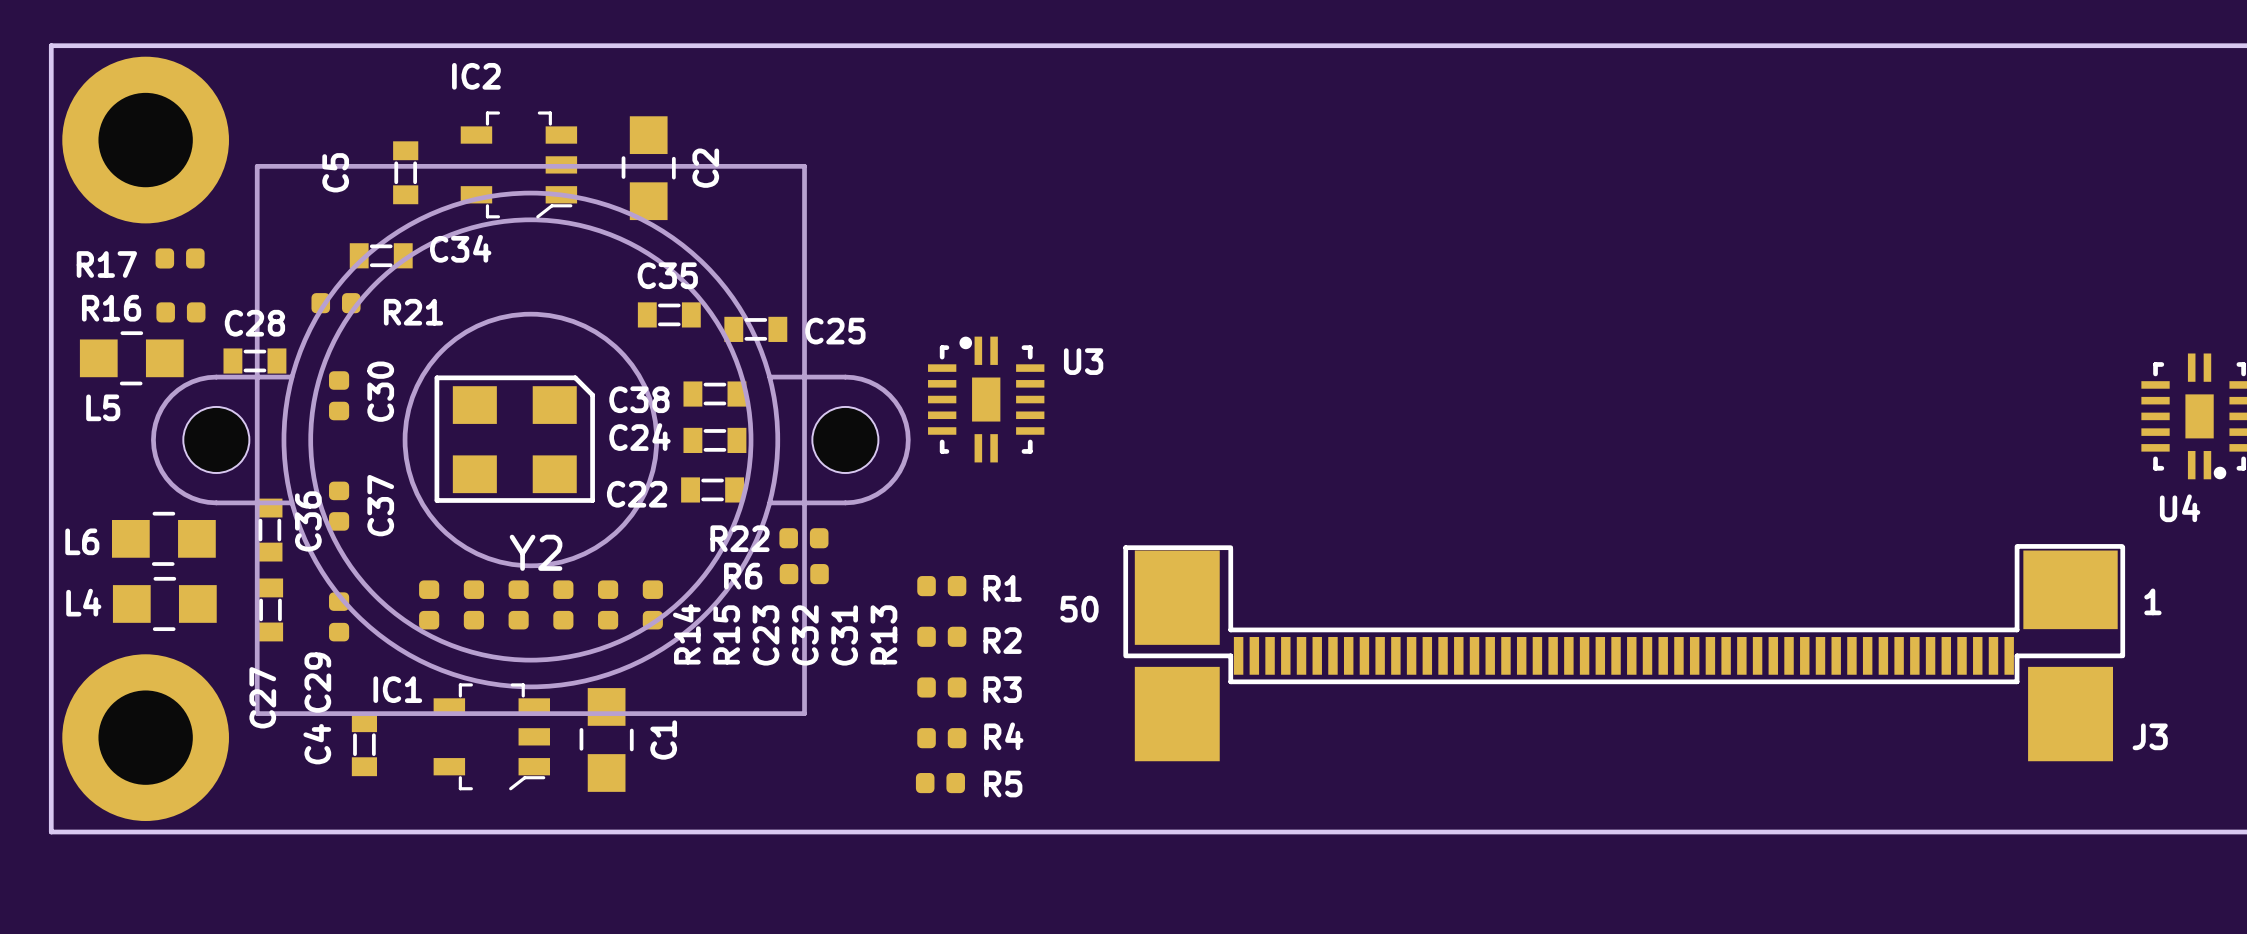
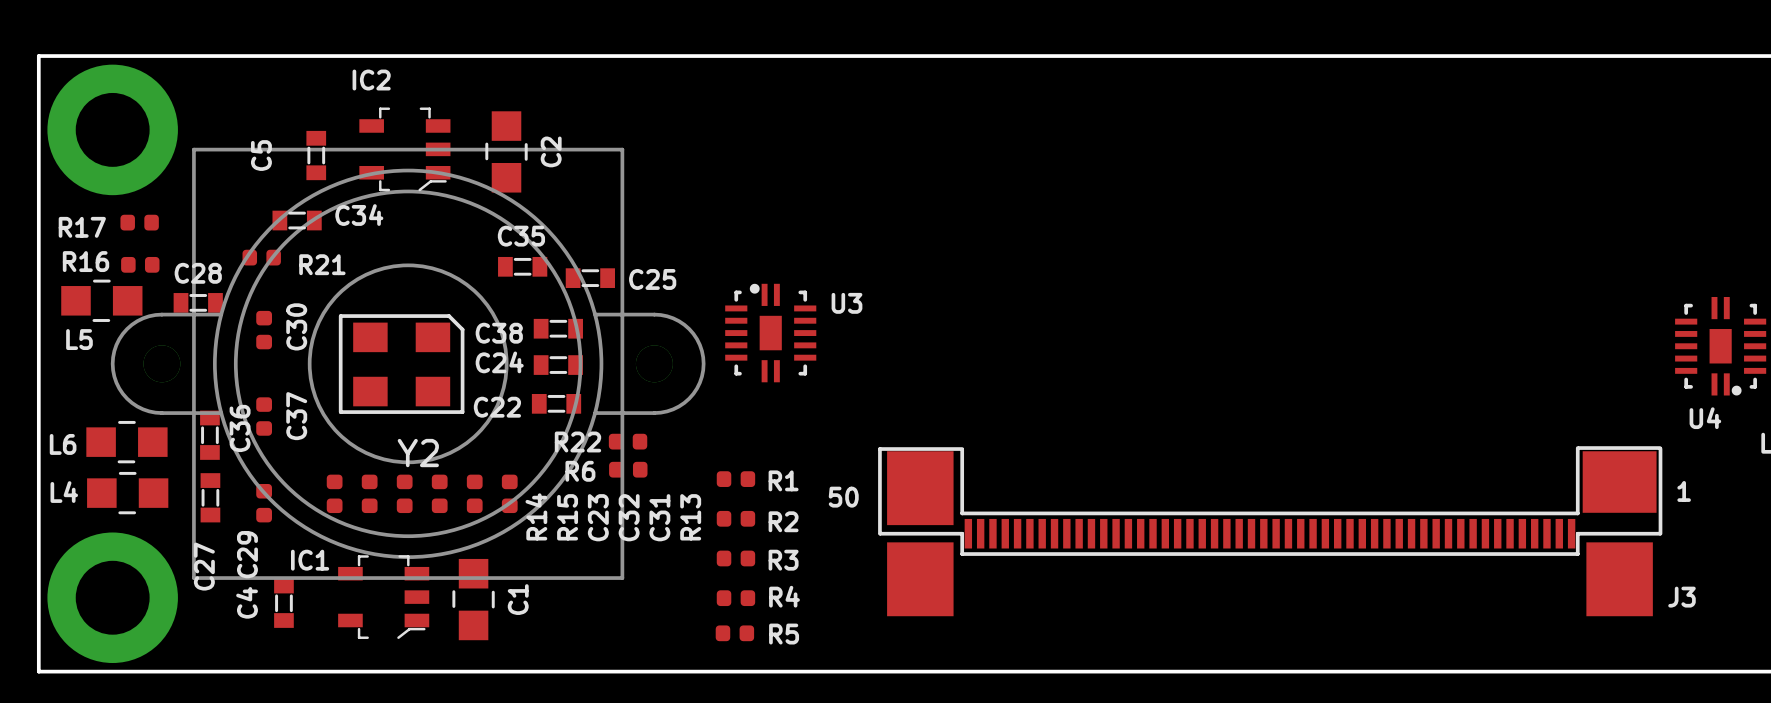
part footprint: [151, 163, 911, 716] -> [110, 147, 706, 580]

